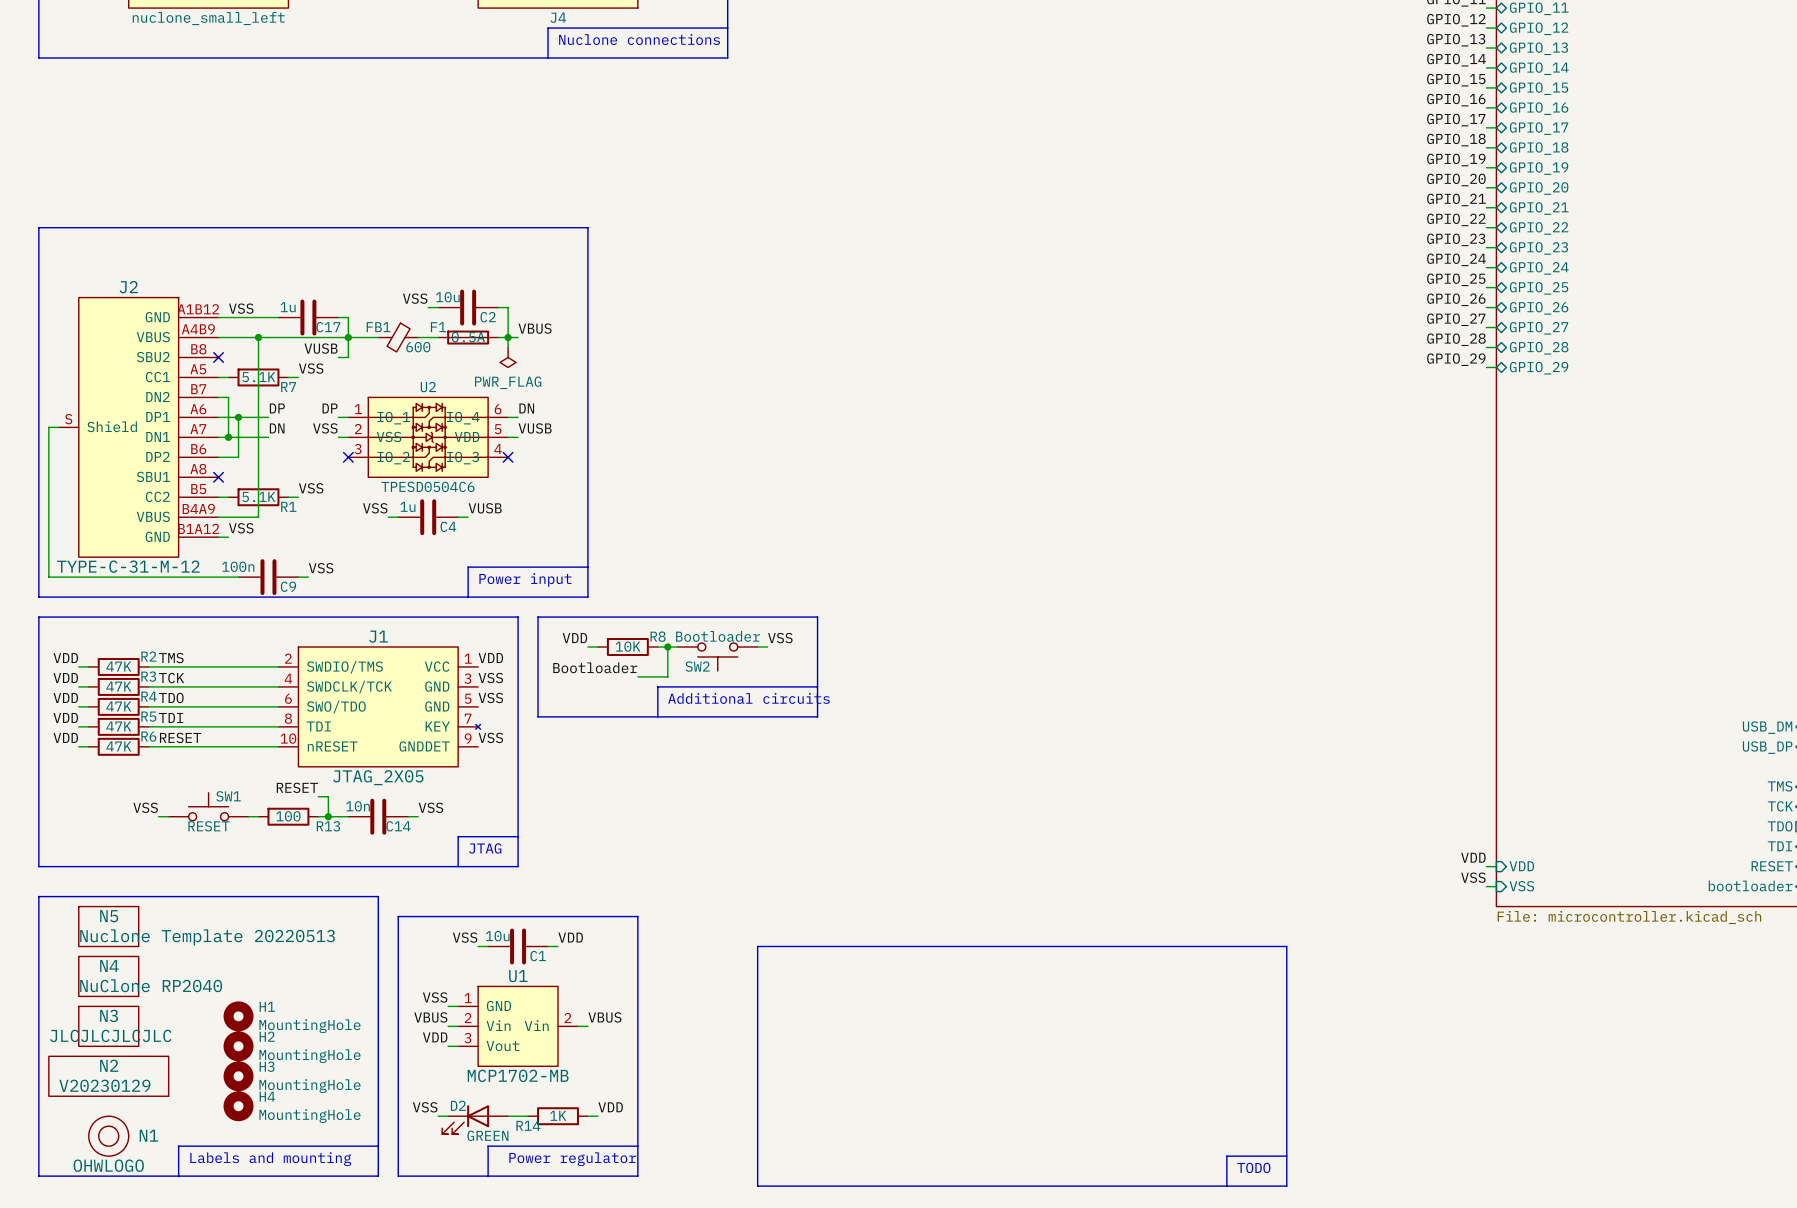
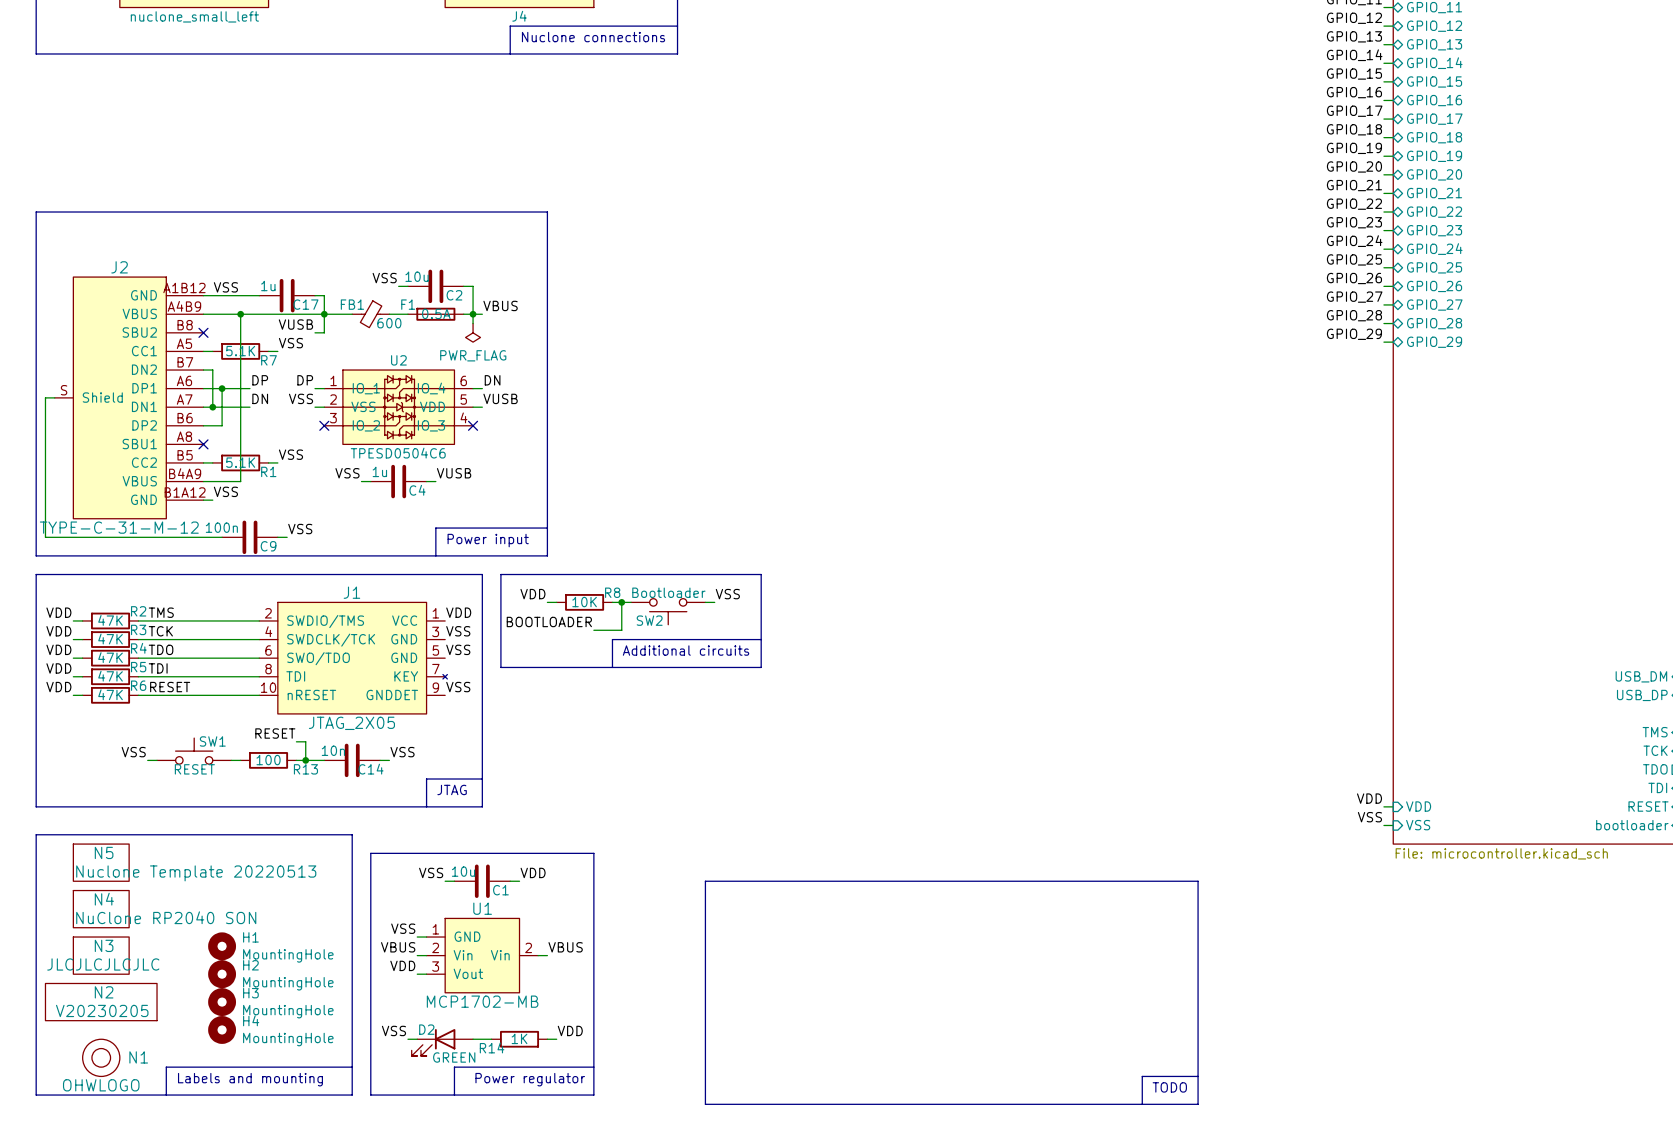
label: Bootloader (595, 667) -> BOOTLOADER (549, 621)
N4 value: NuClone RP2040 (151, 985) -> NuClone RP2040 SON (166, 917)
N2 value: V20230129 (104, 1085) -> V20230205 (102, 1010)

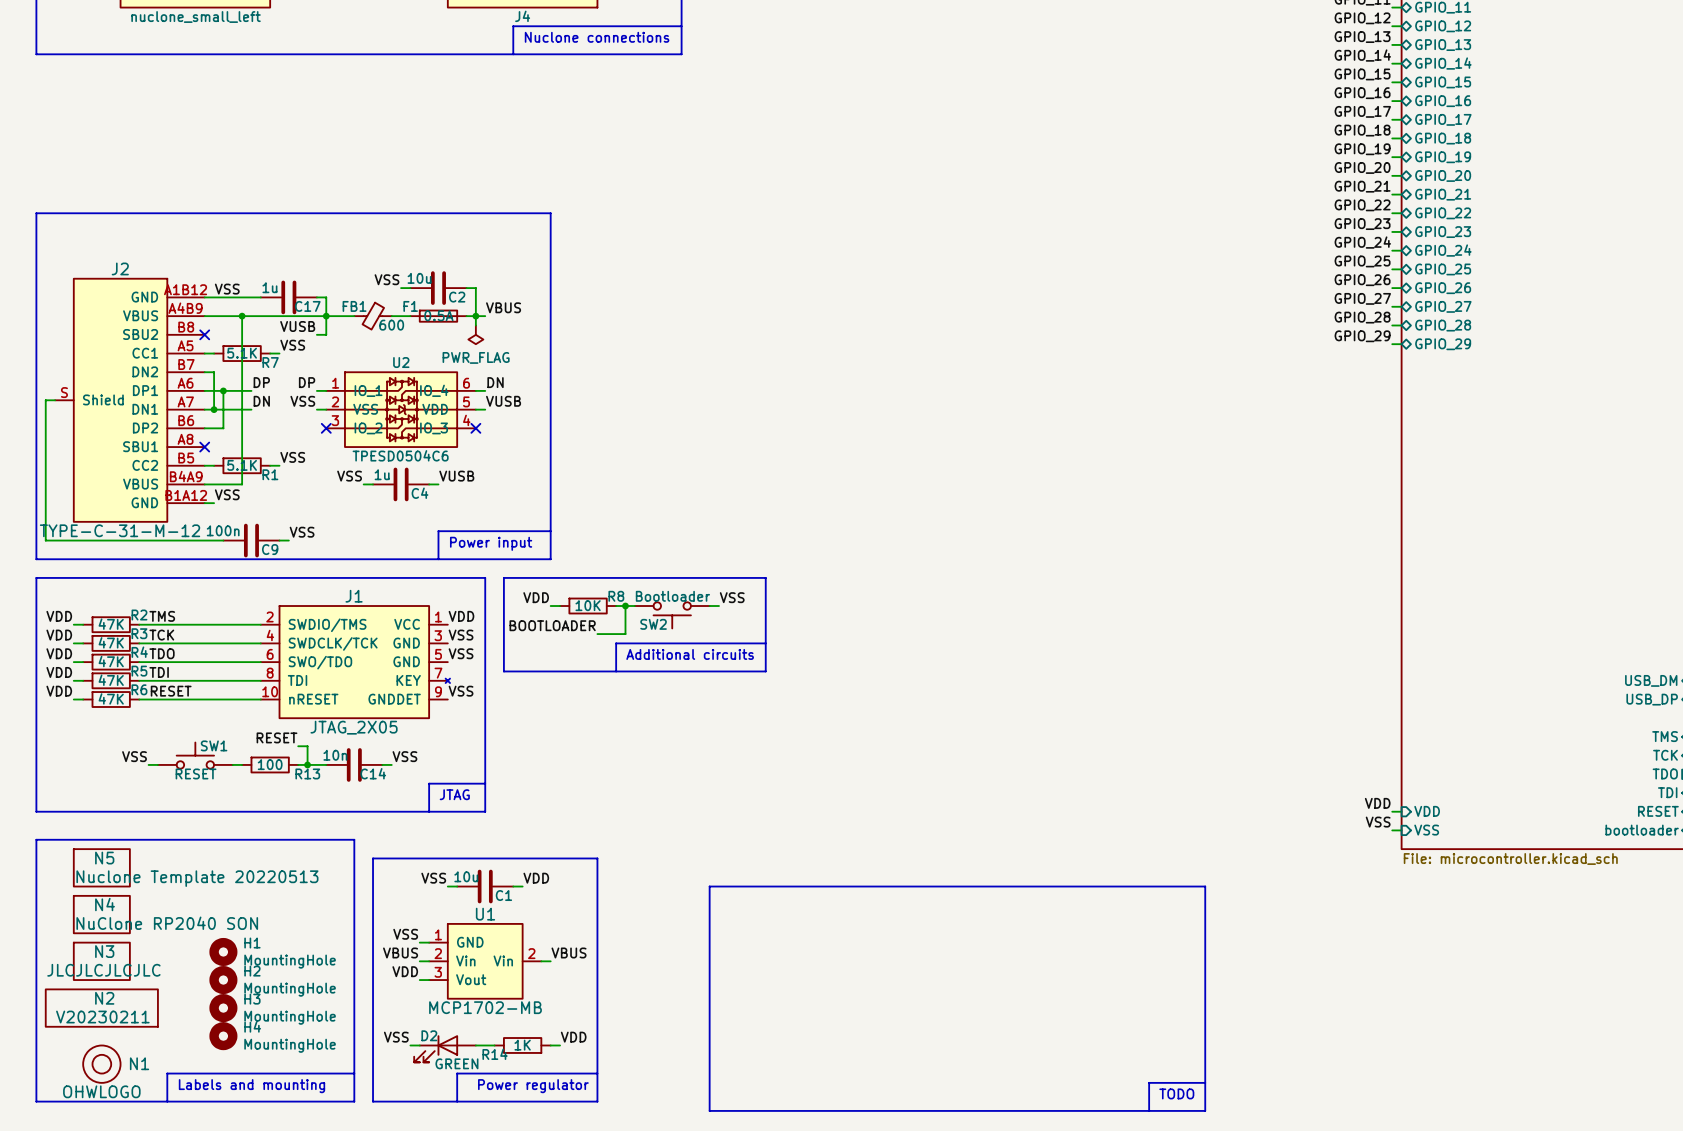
N2 value: V20230205 (102, 1010) -> V20230211 (102, 1017)

